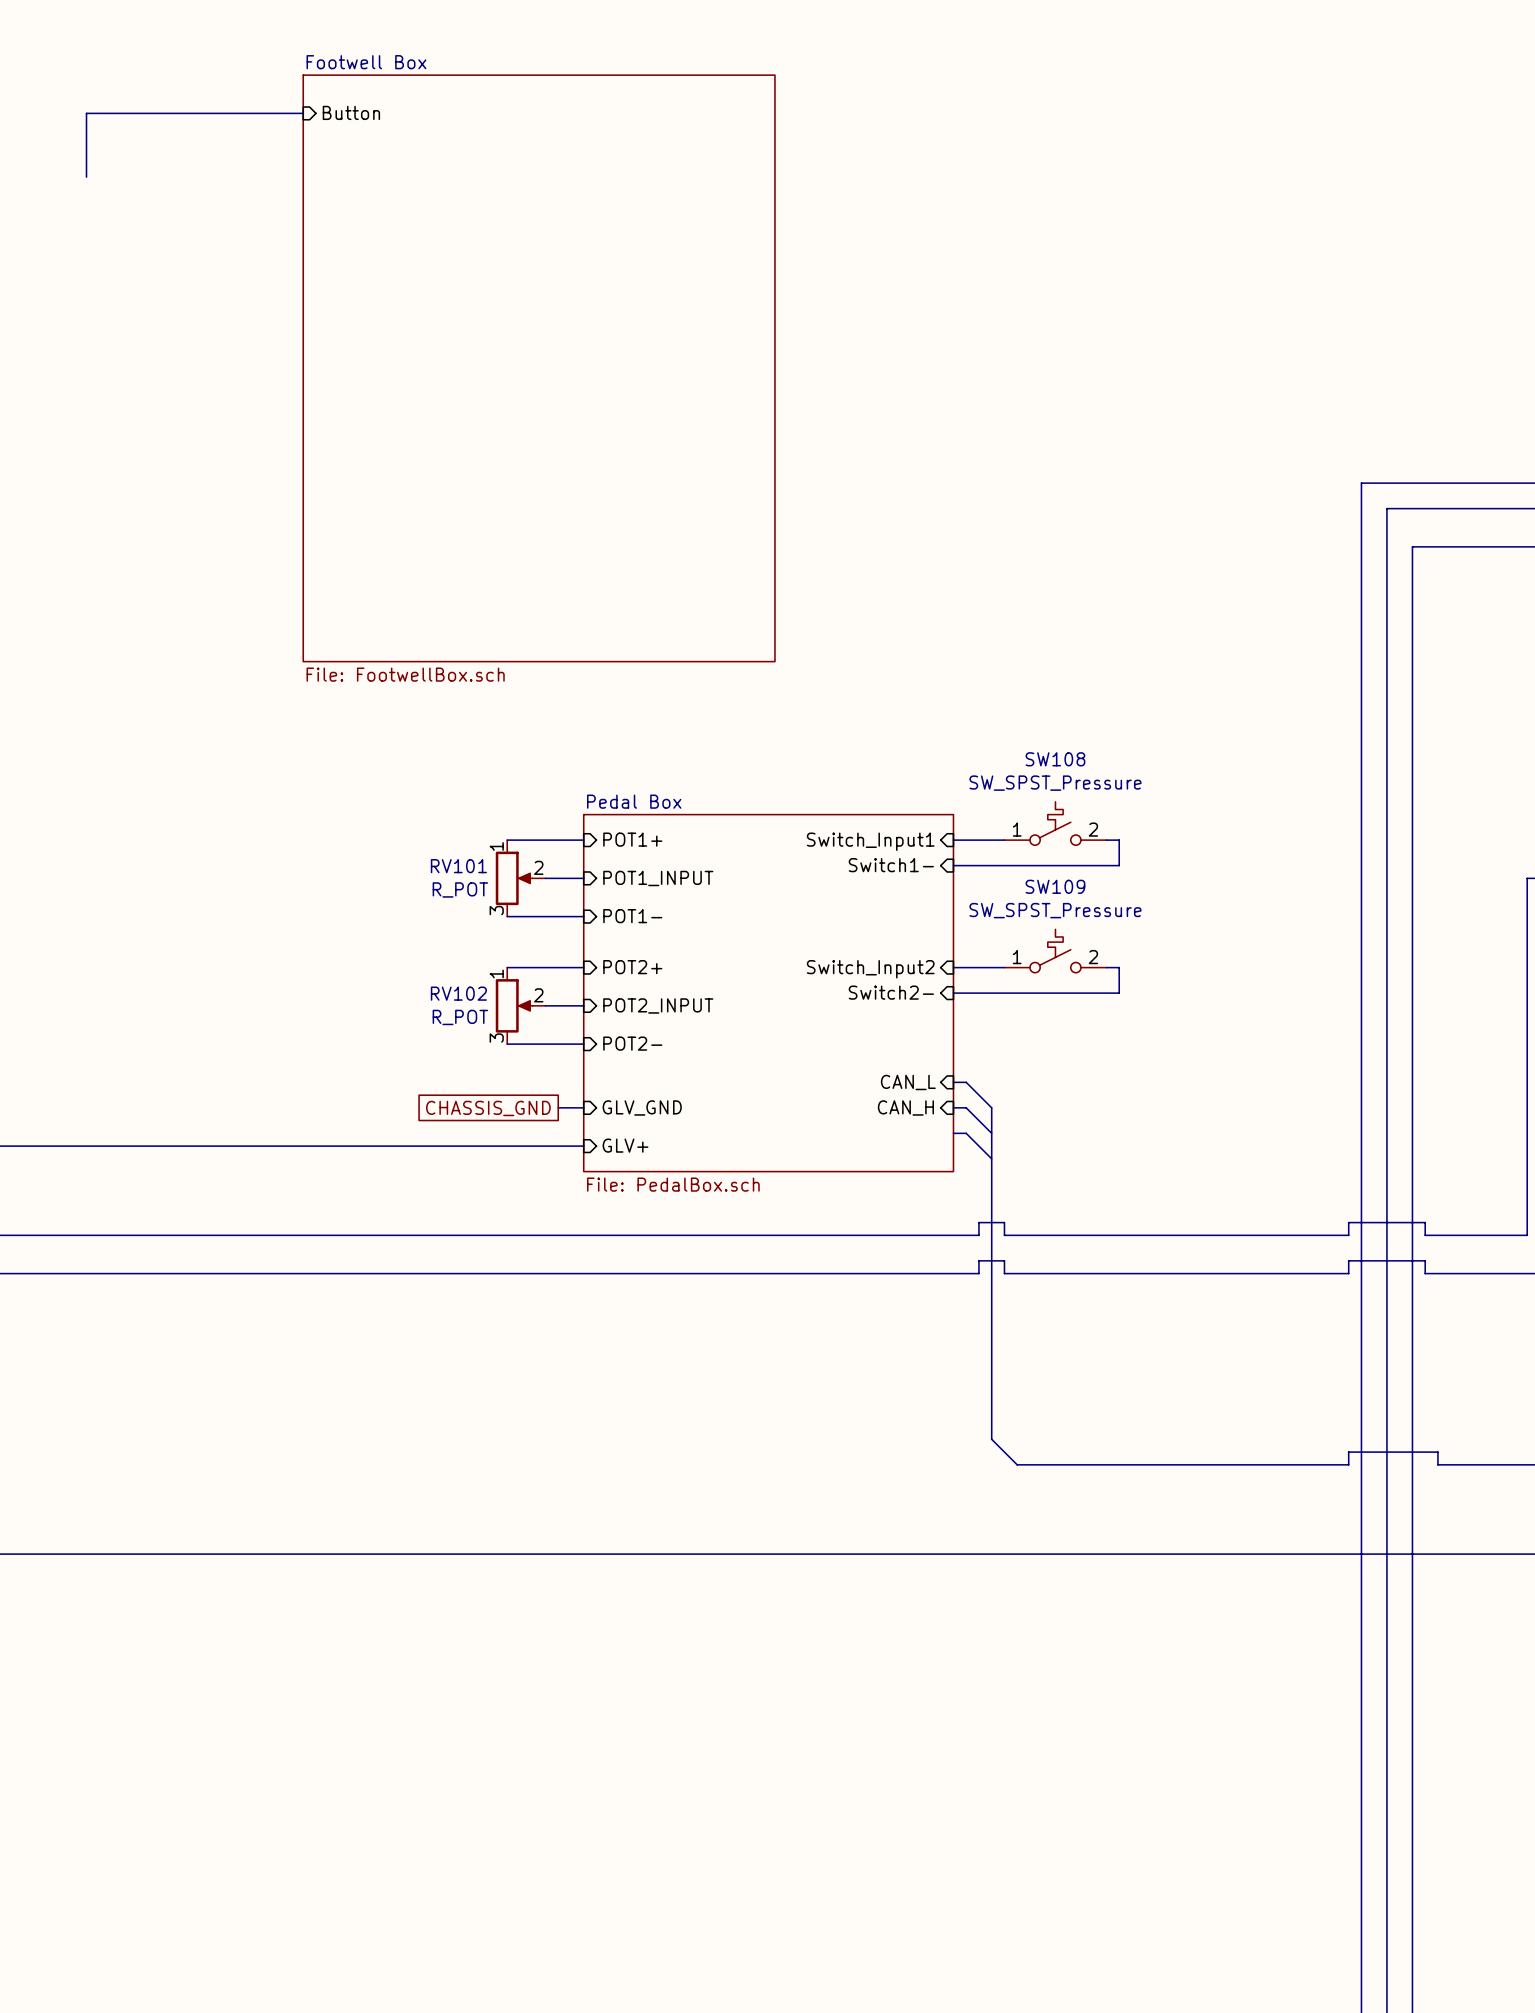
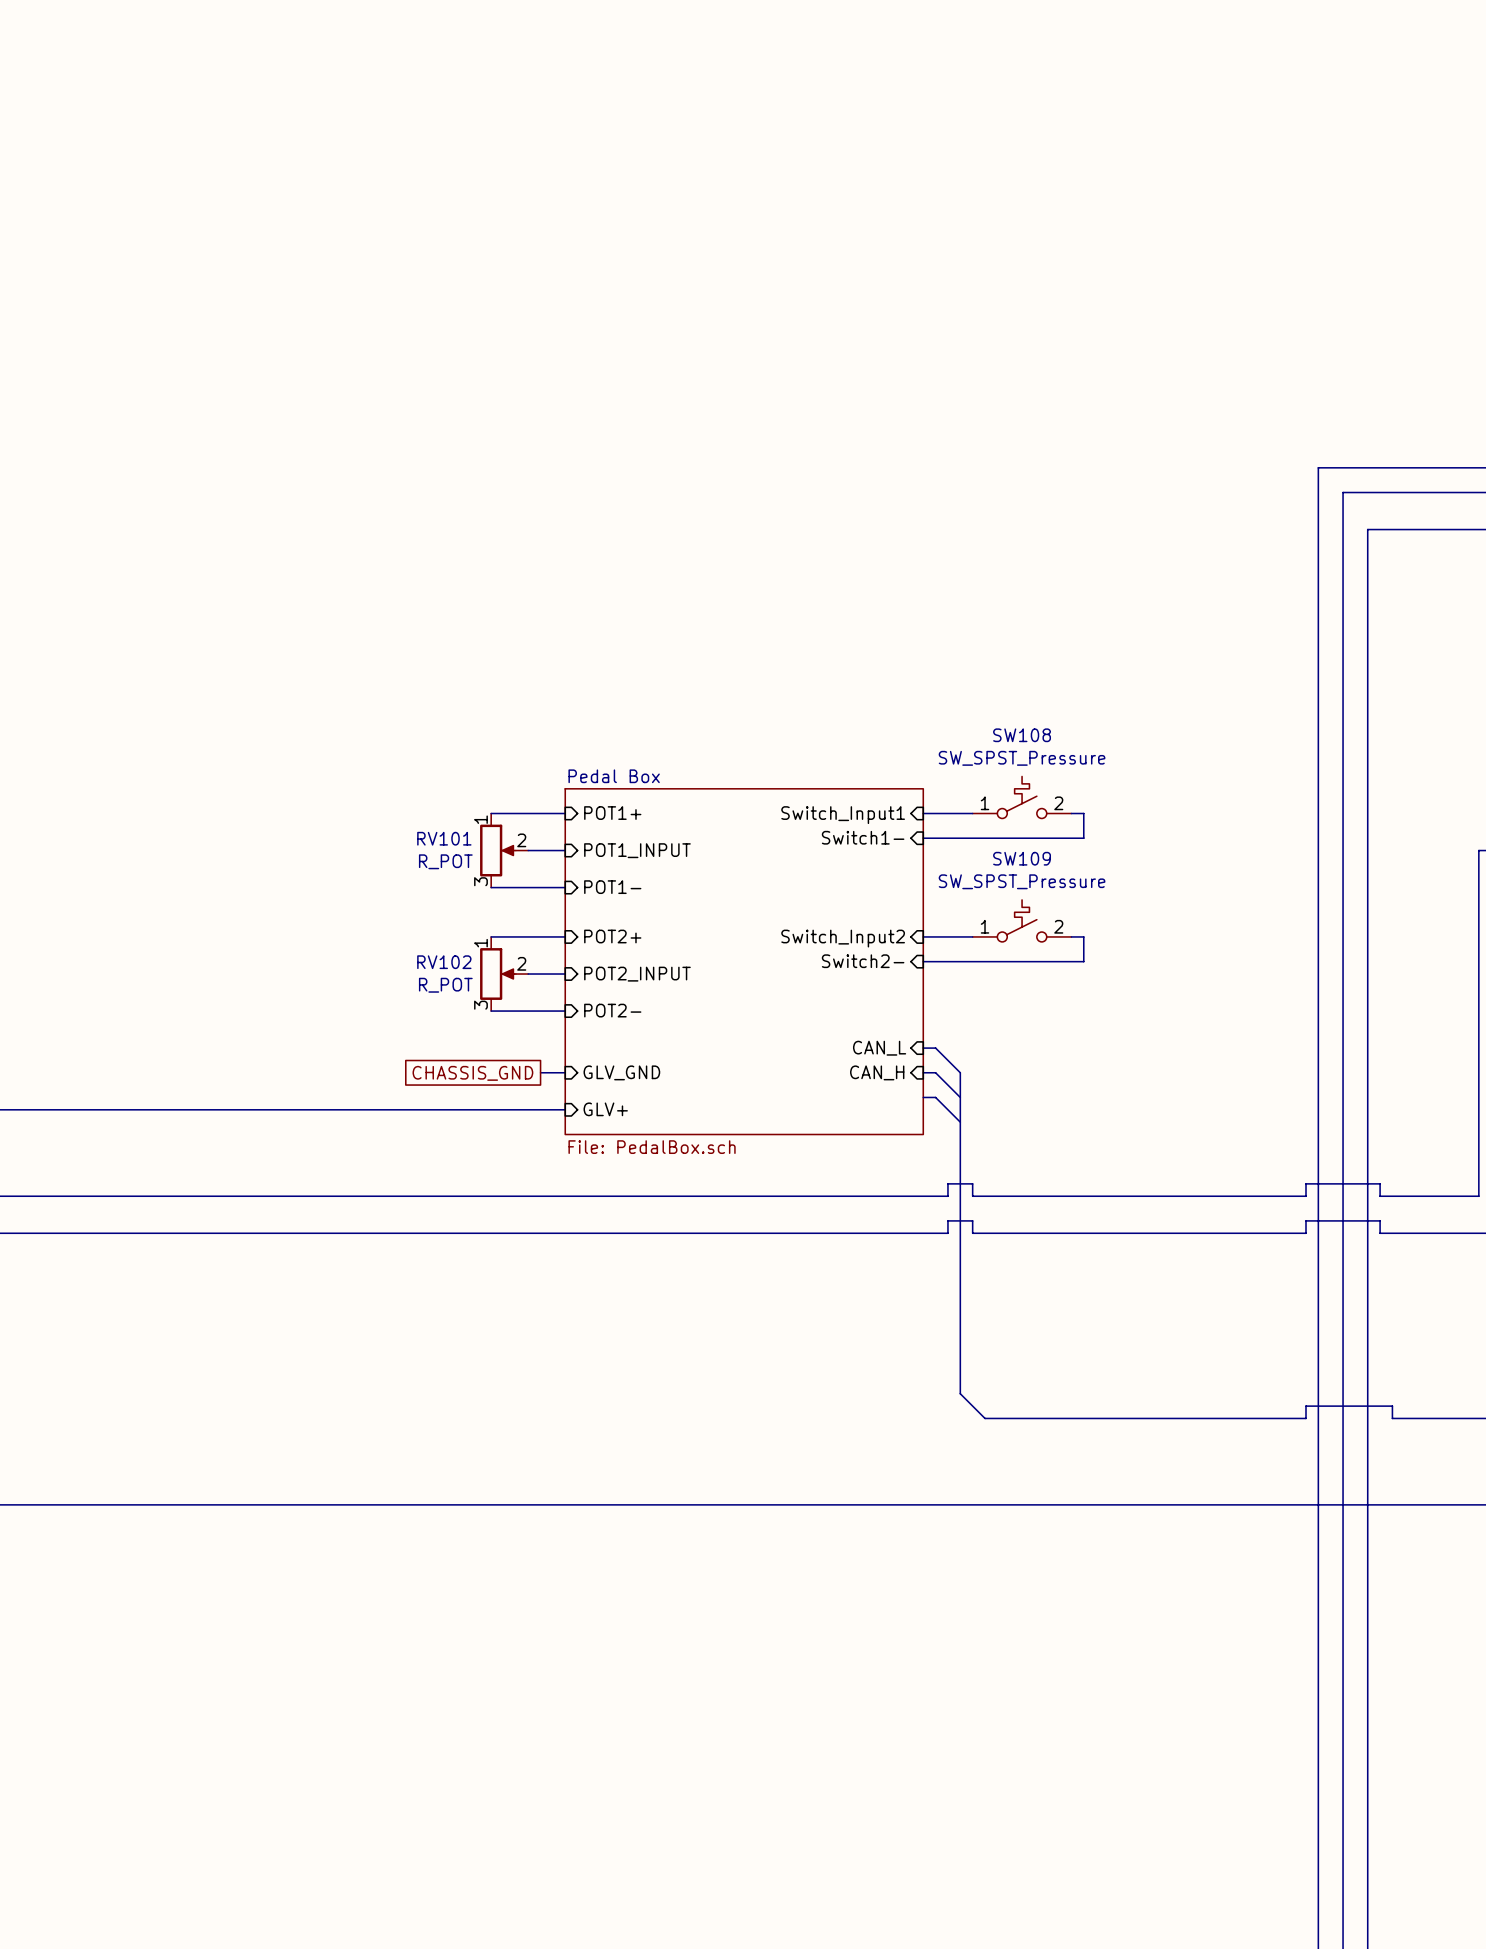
sheet pin: Button (351, 112) -> none
wire: (303, 113) (86, 113) (86, 177) -> none
sheet Footwell Box: File: FootwellBox.sch (539, 368) -> none

